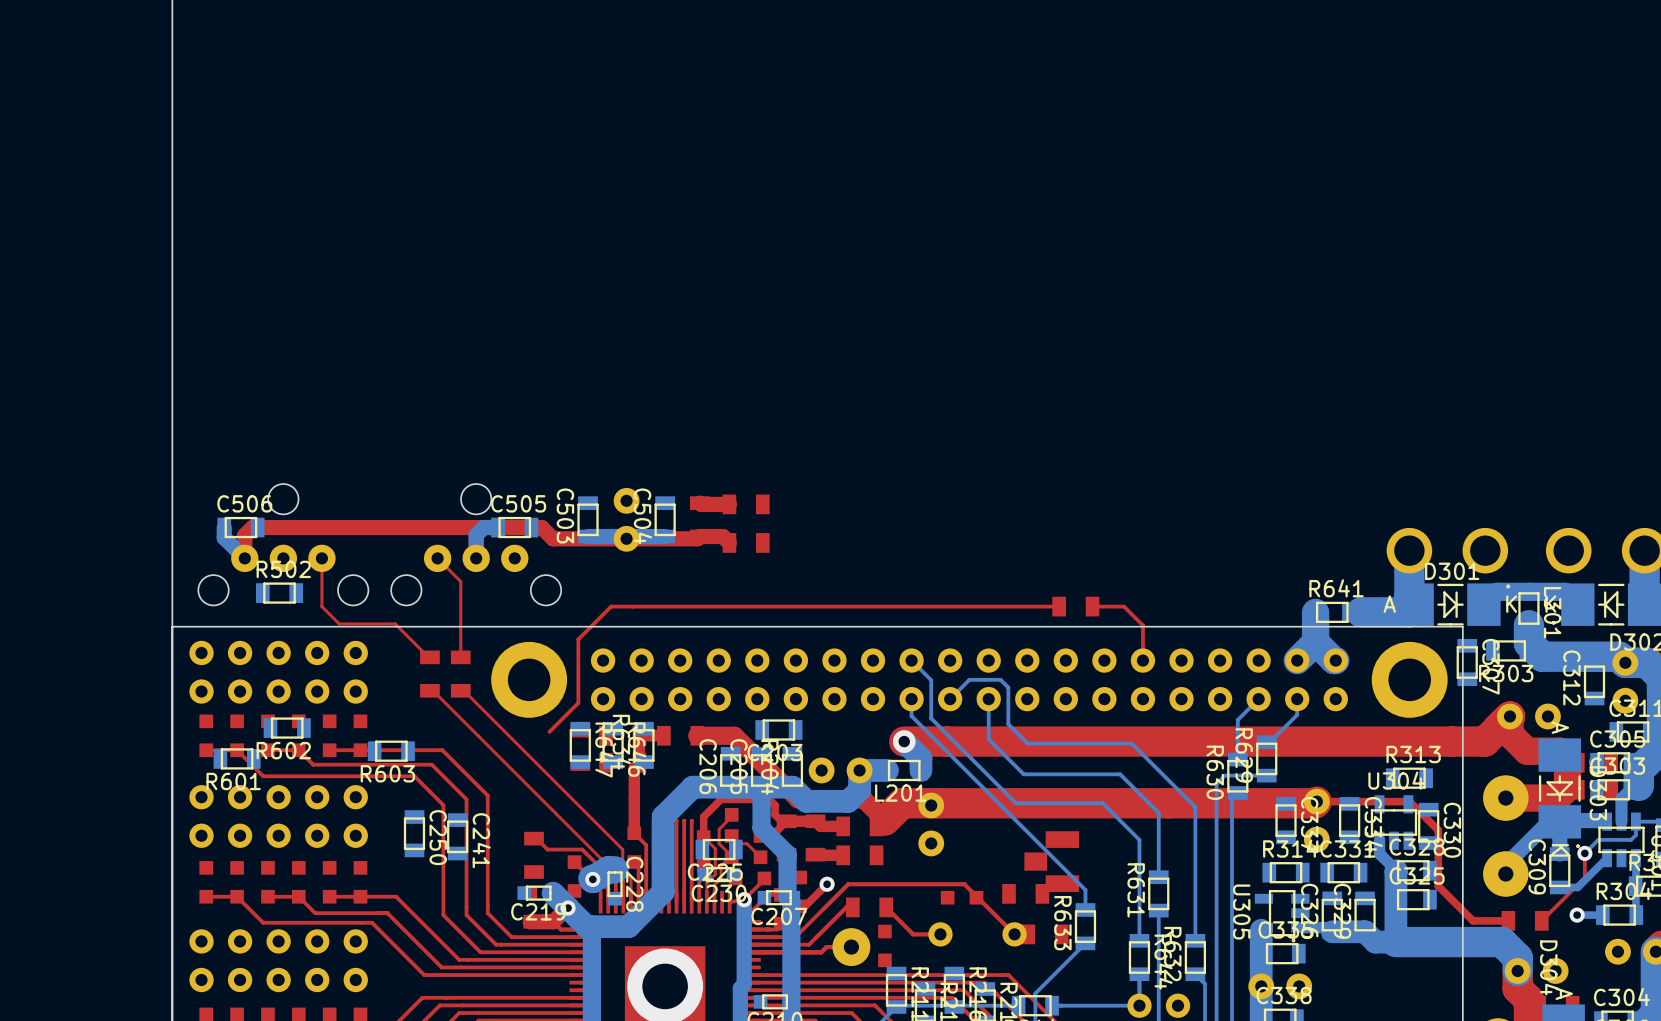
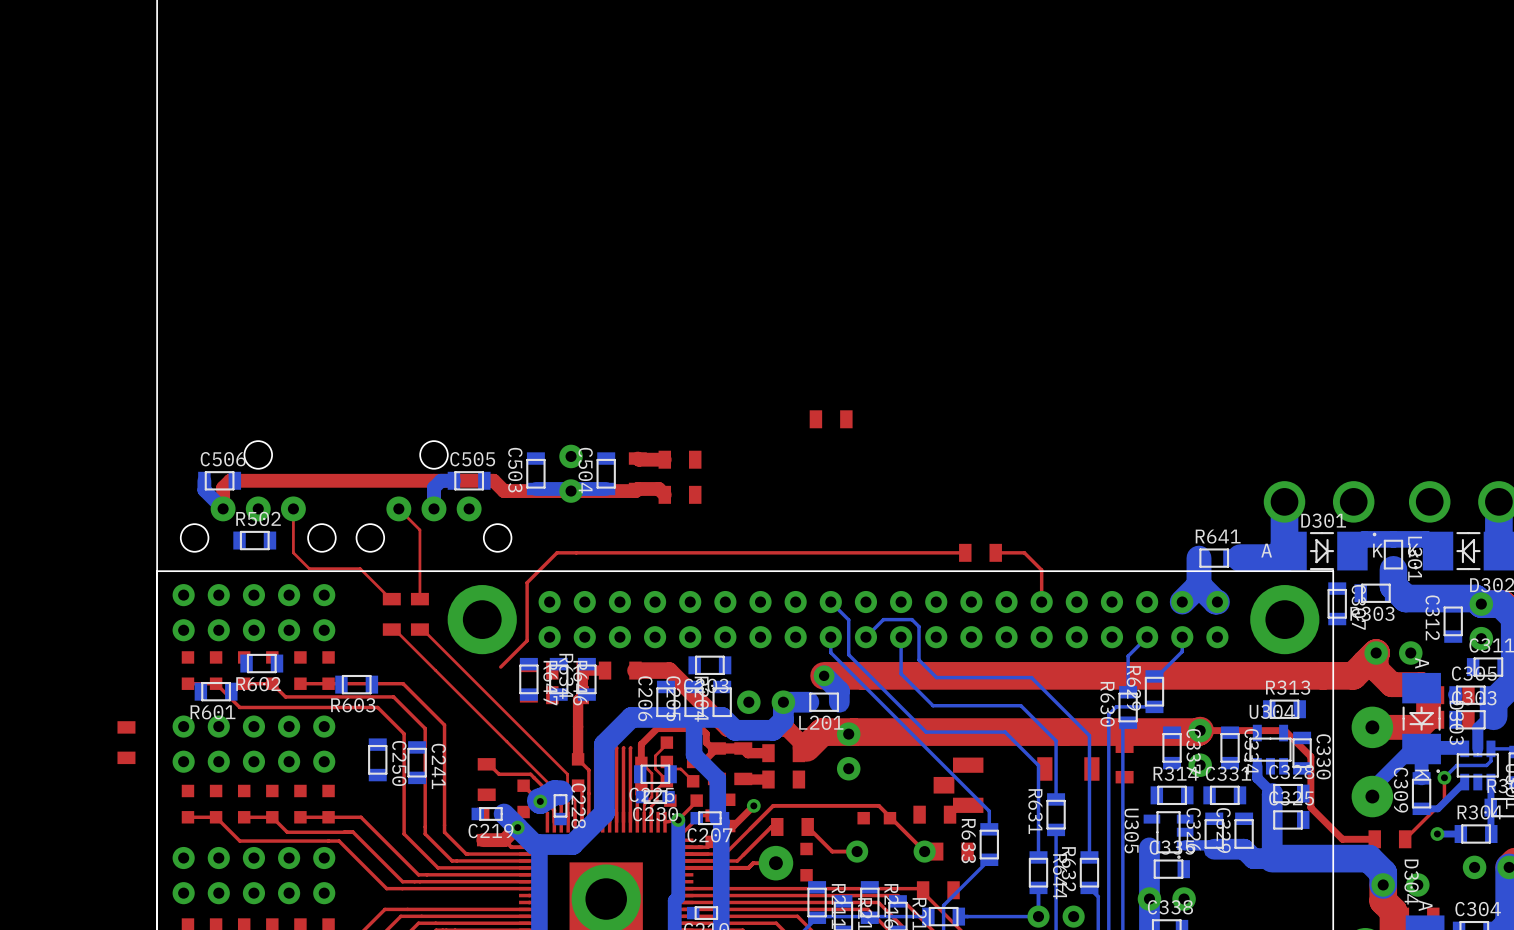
part: none -> (831, 419)
part: none -> (126, 742)
part: none -> (1124, 761)
part: none -> (1068, 768)
part: none -> (938, 890)

